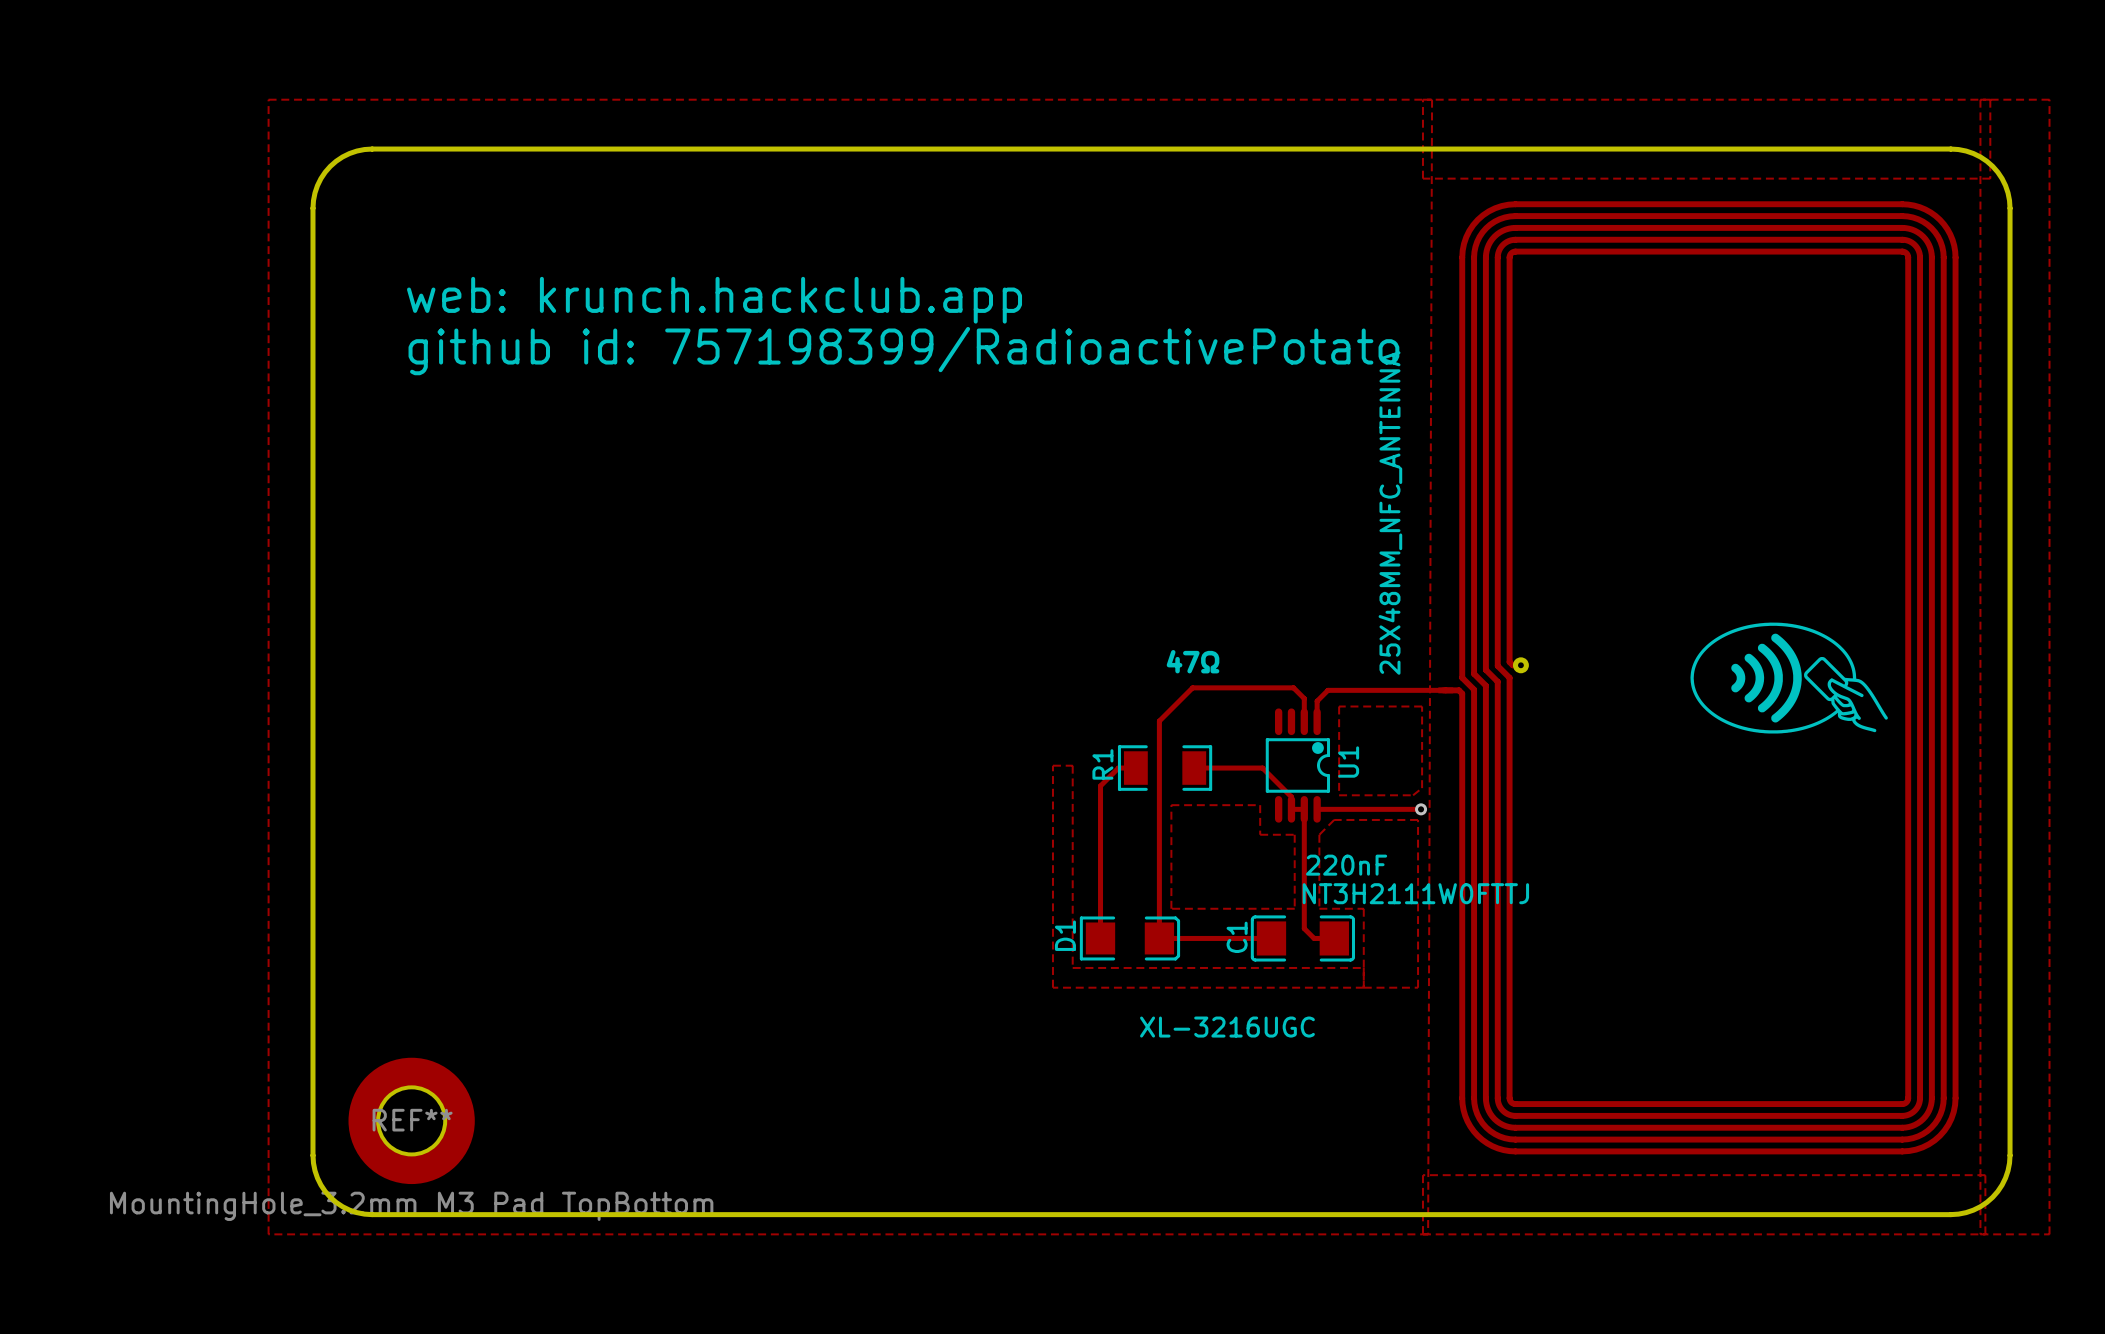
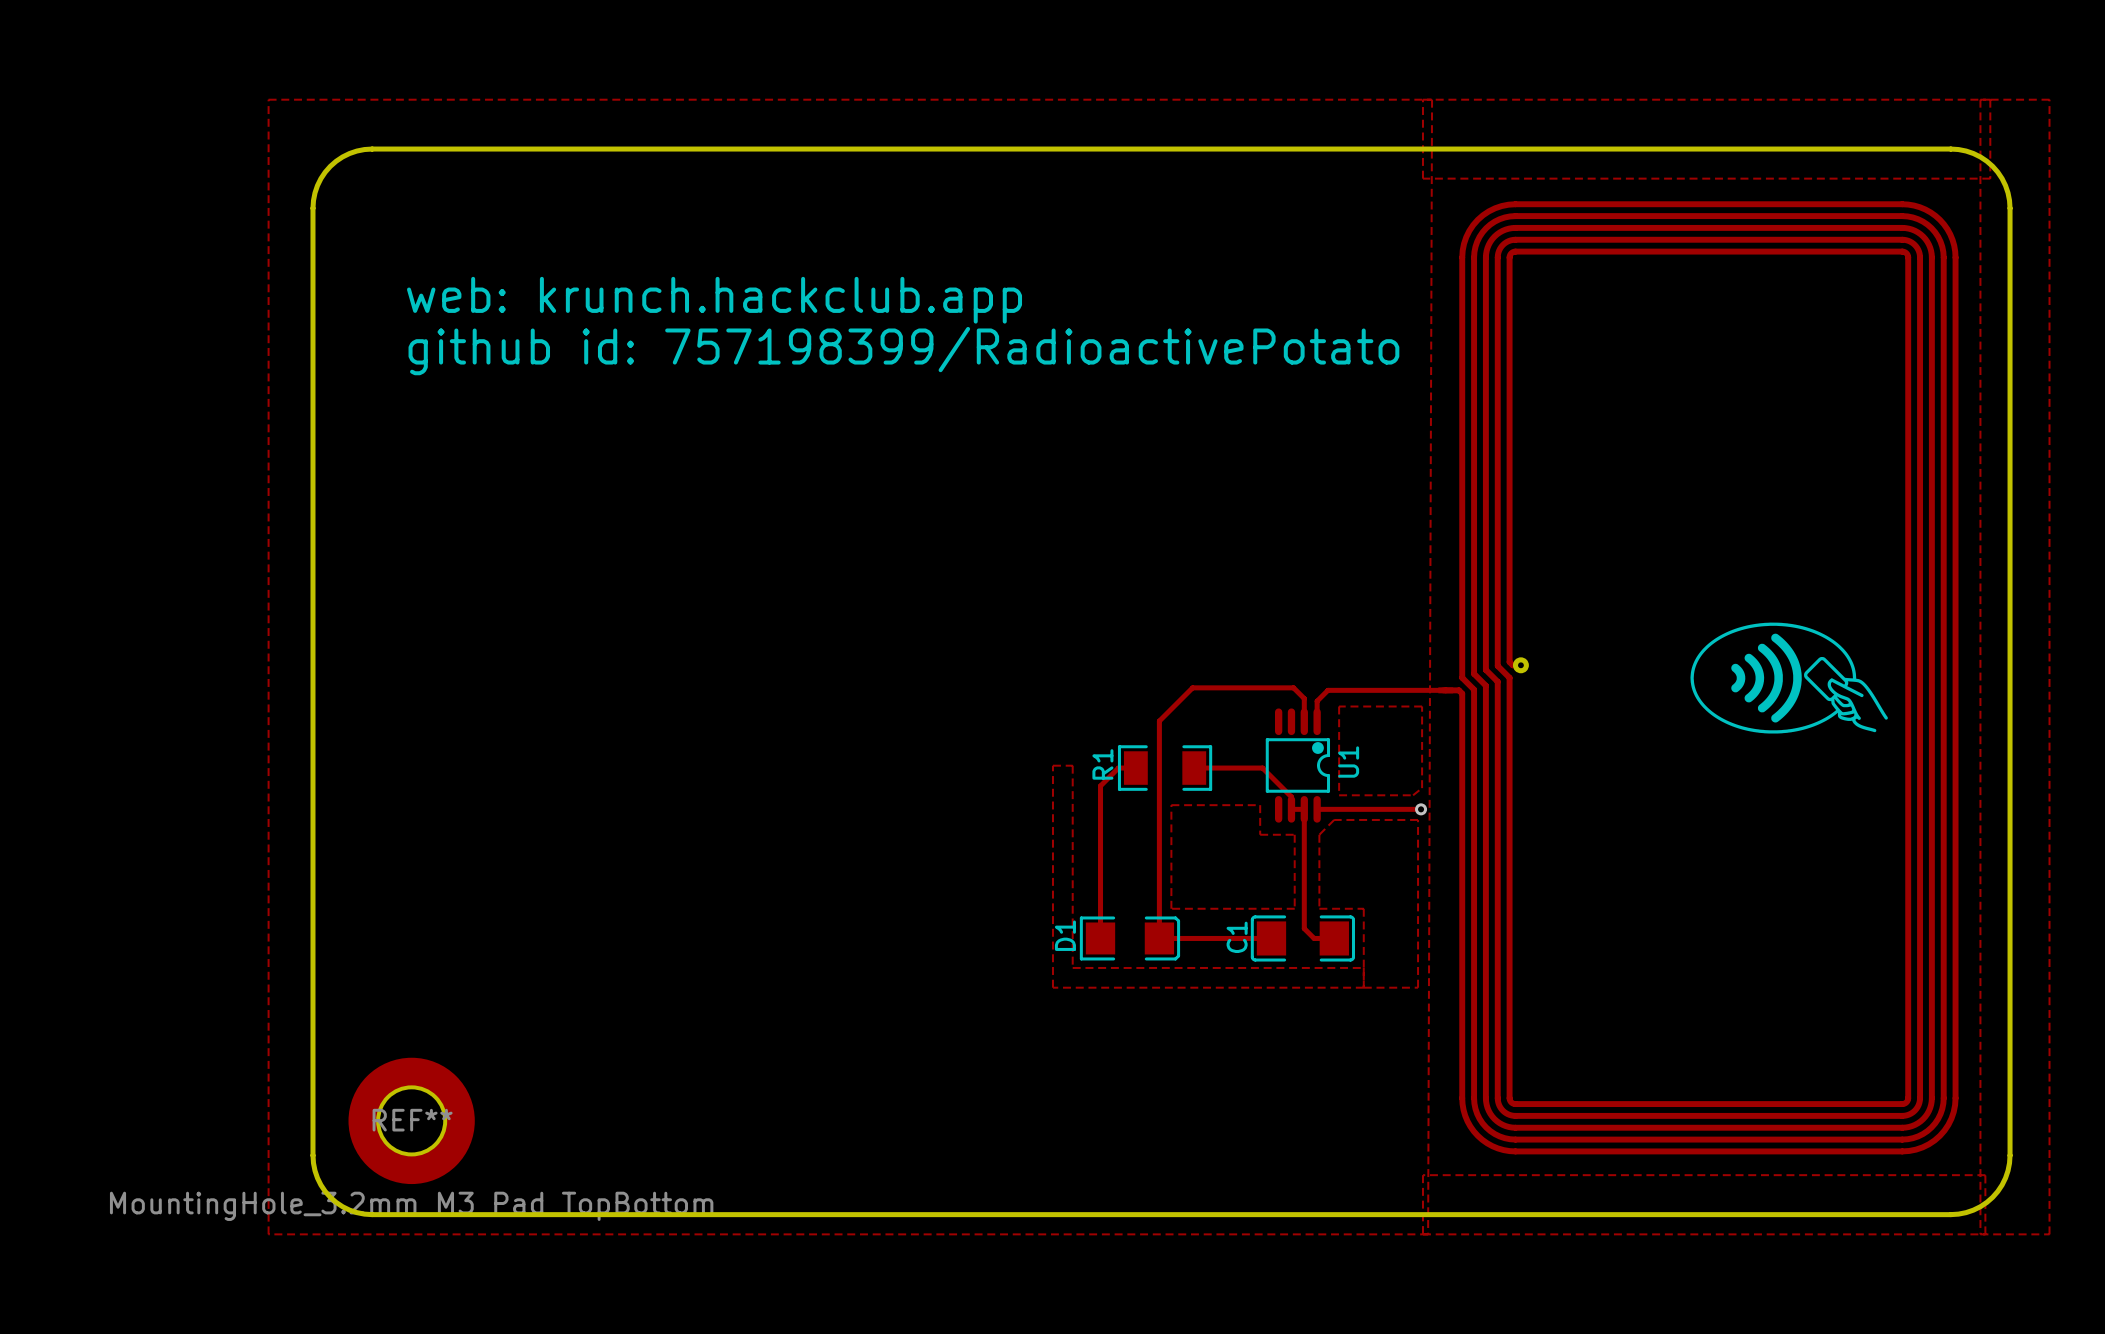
part value: 25X48MM_NFC_ANTENNA (1390, 513) -> none
R1 value: 47Ω (1193, 661) -> none
C1 value: 220nF (1346, 865) -> none
U1 value: NT3H2111W0FTTJ (1415, 893) -> none
D1 value: XL-3216UGC (1227, 1027) -> none

